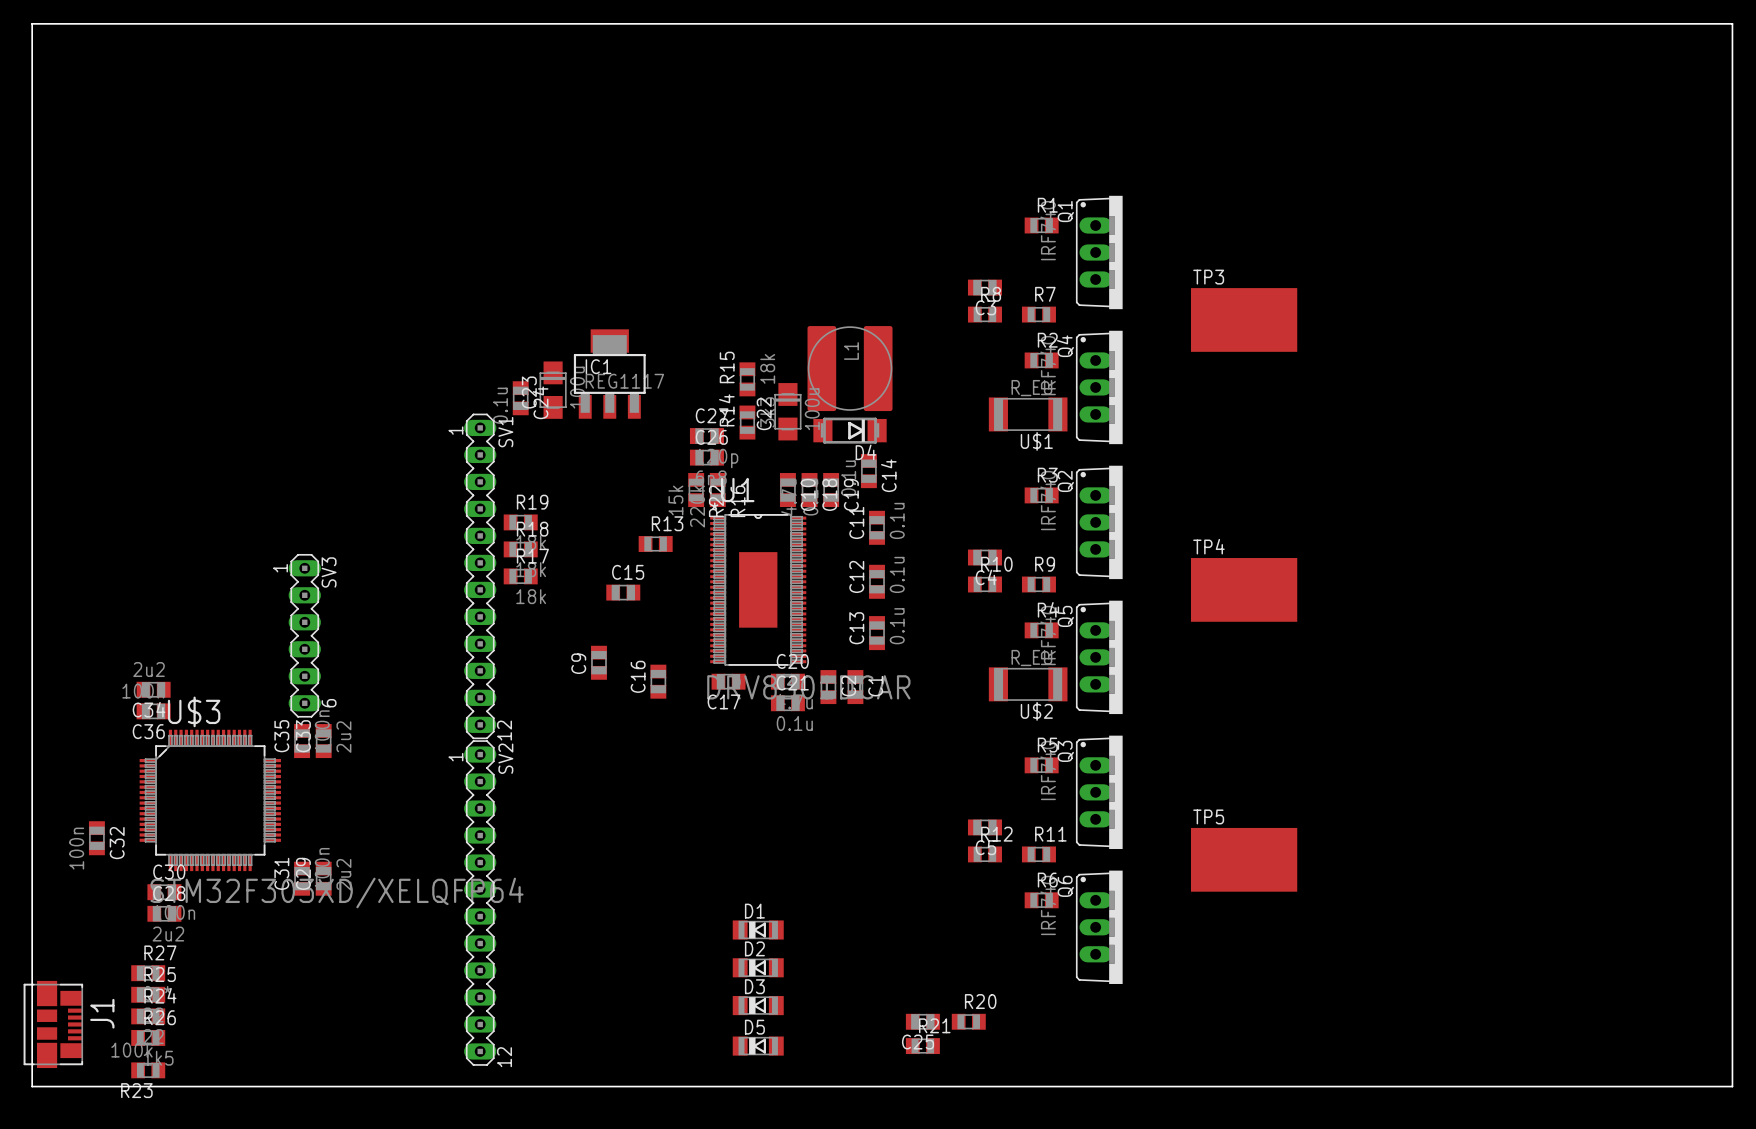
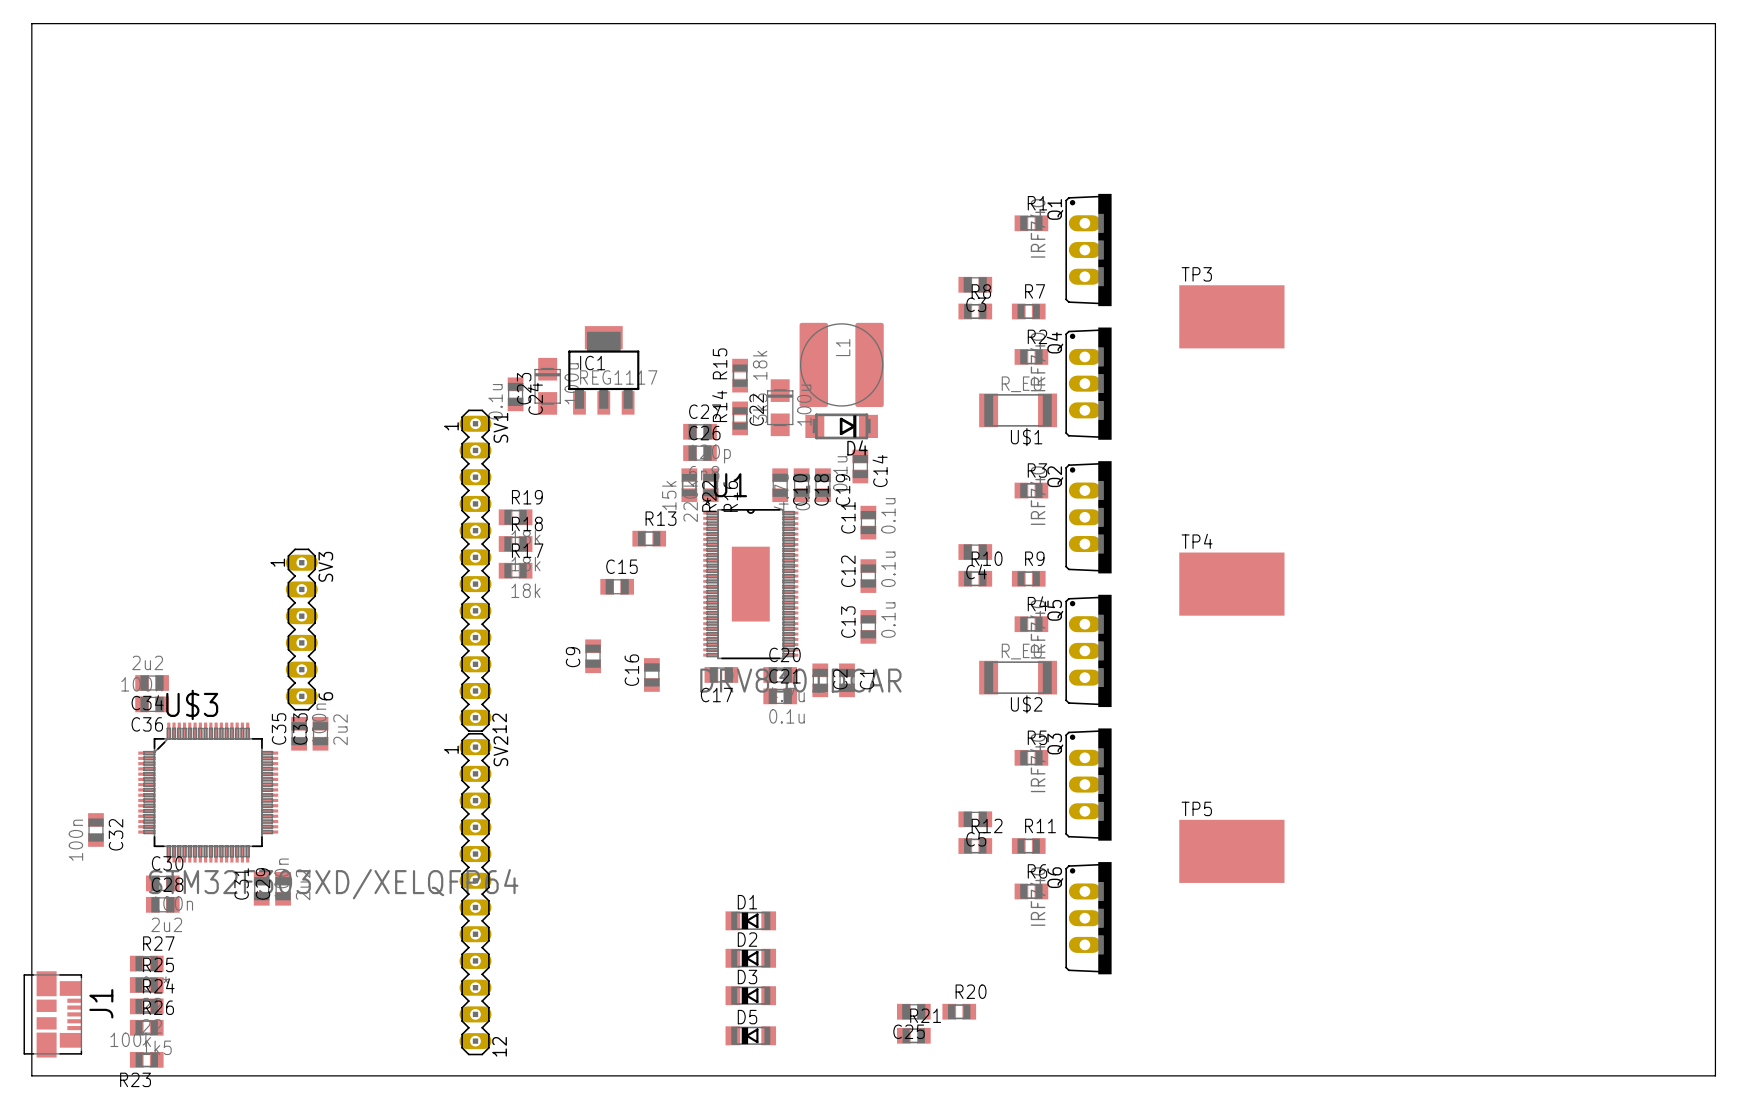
C31 position: (302, 878) -> (261, 888)
C29 position: (323, 878) -> (283, 888)

